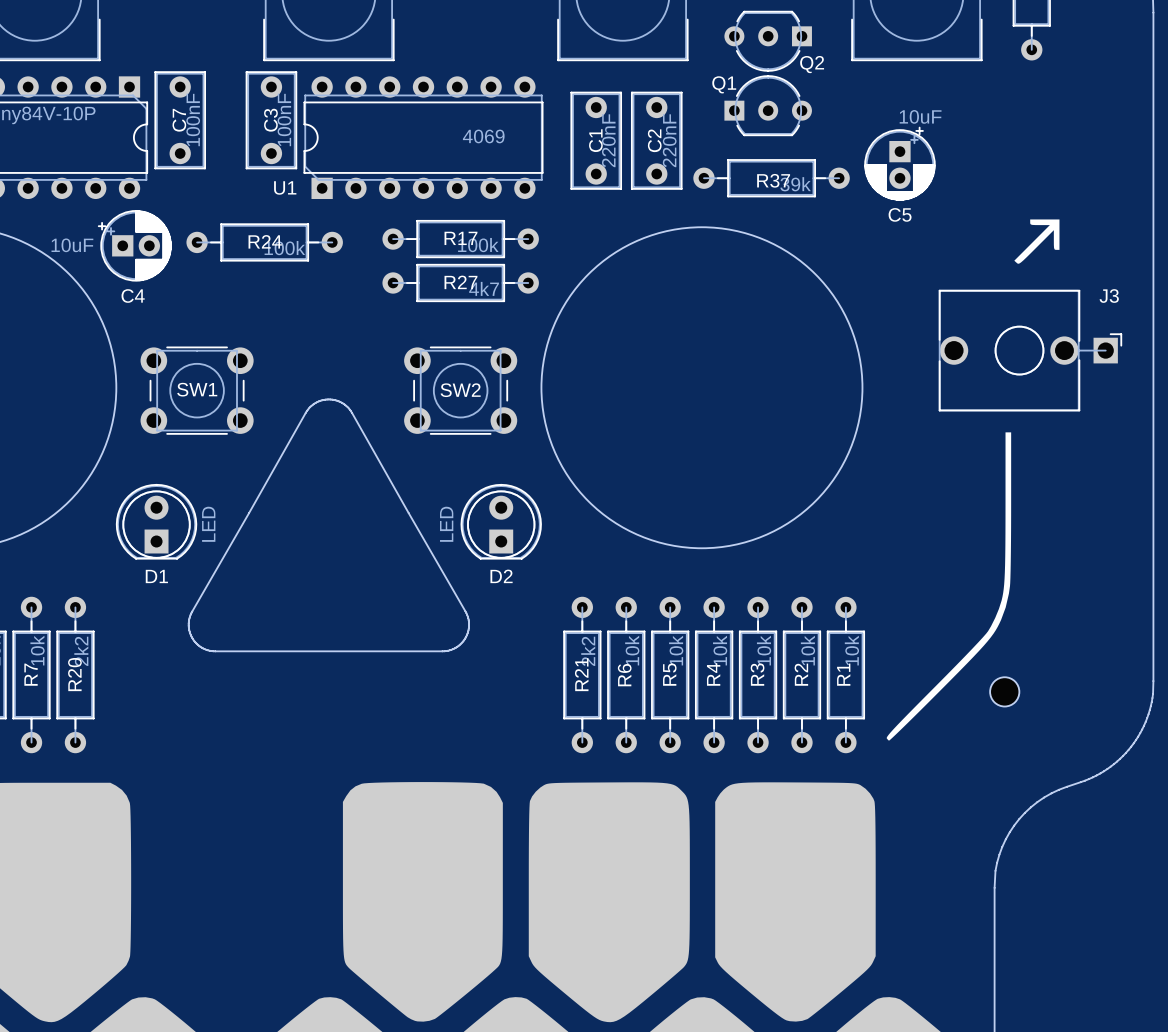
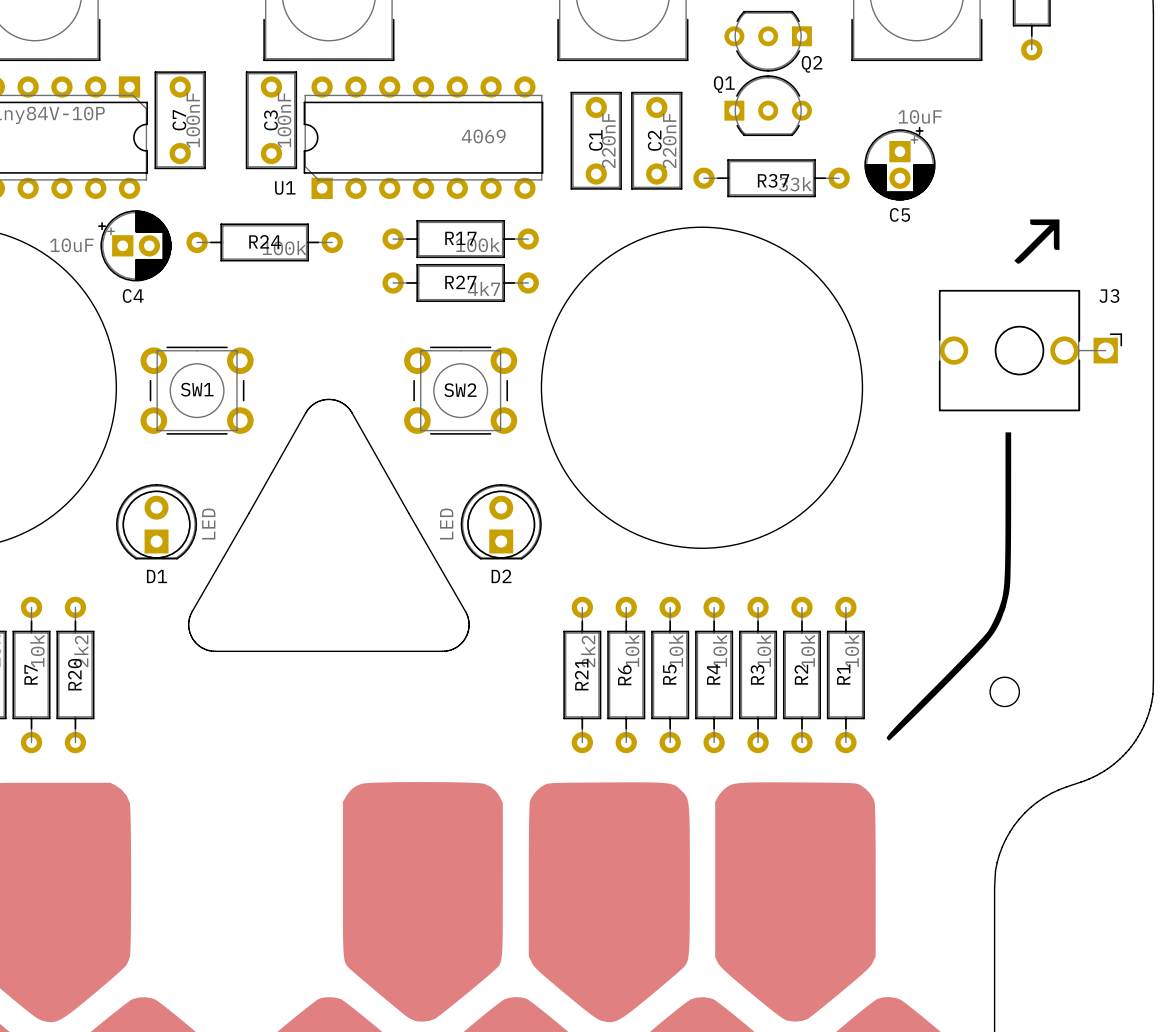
R37 value: 39k (795, 184) -> 33k (795, 184)

